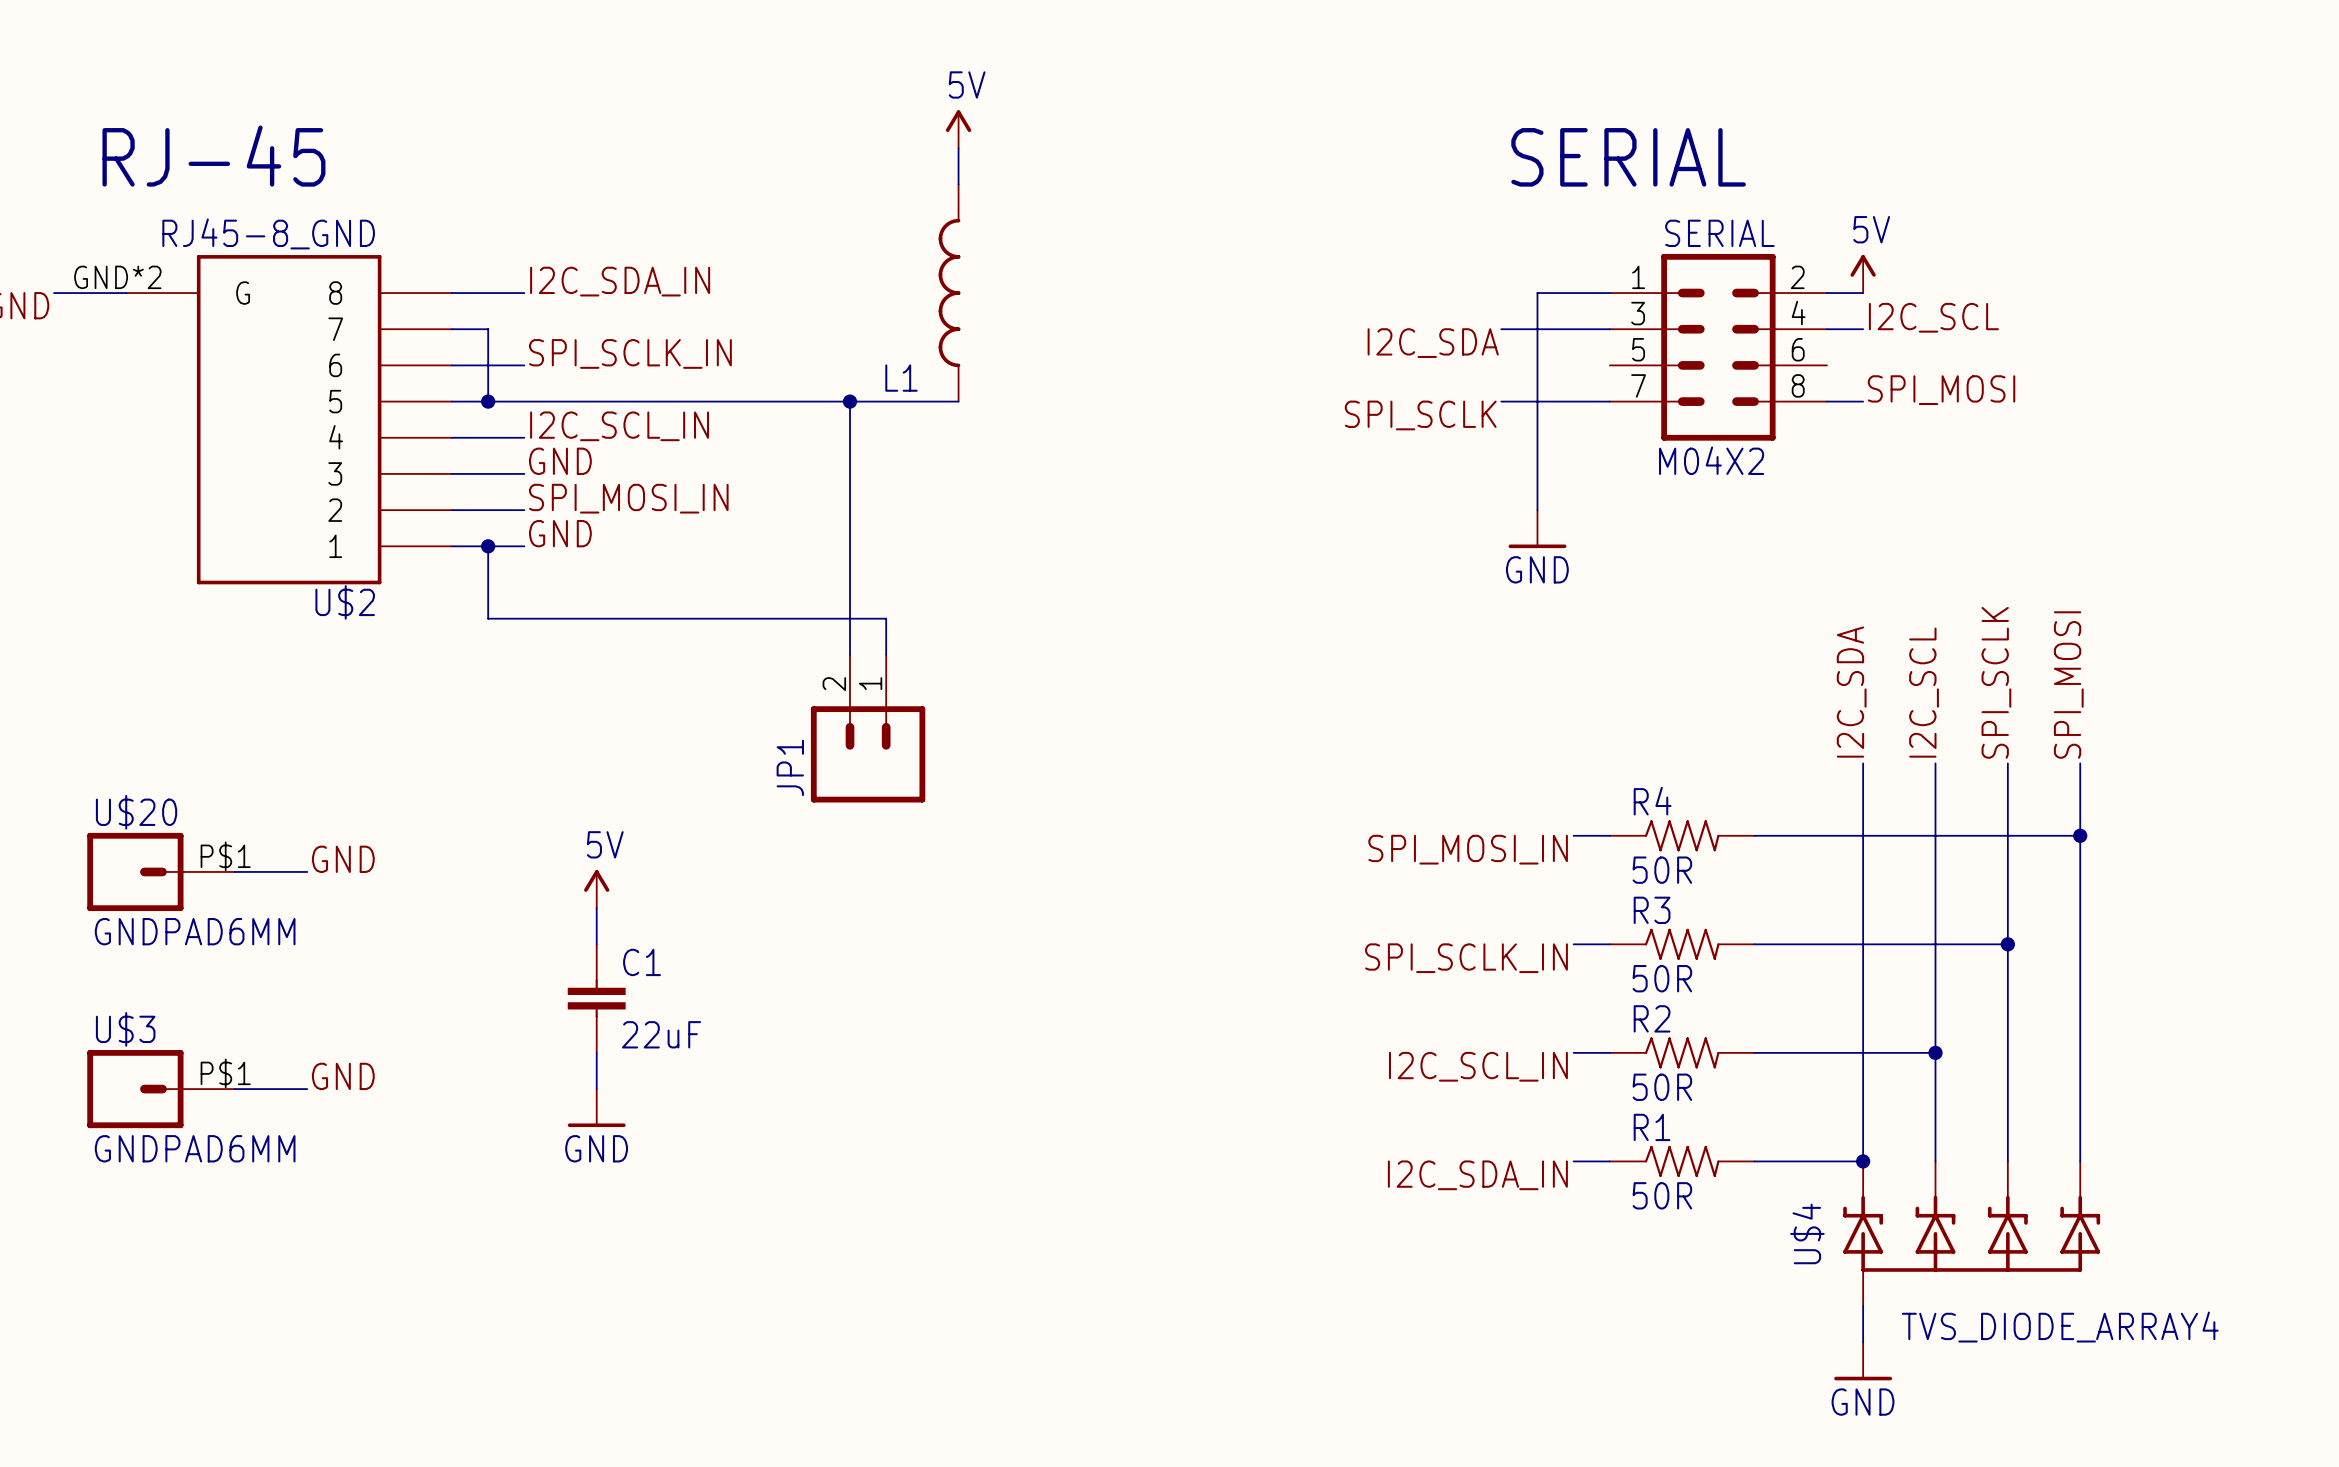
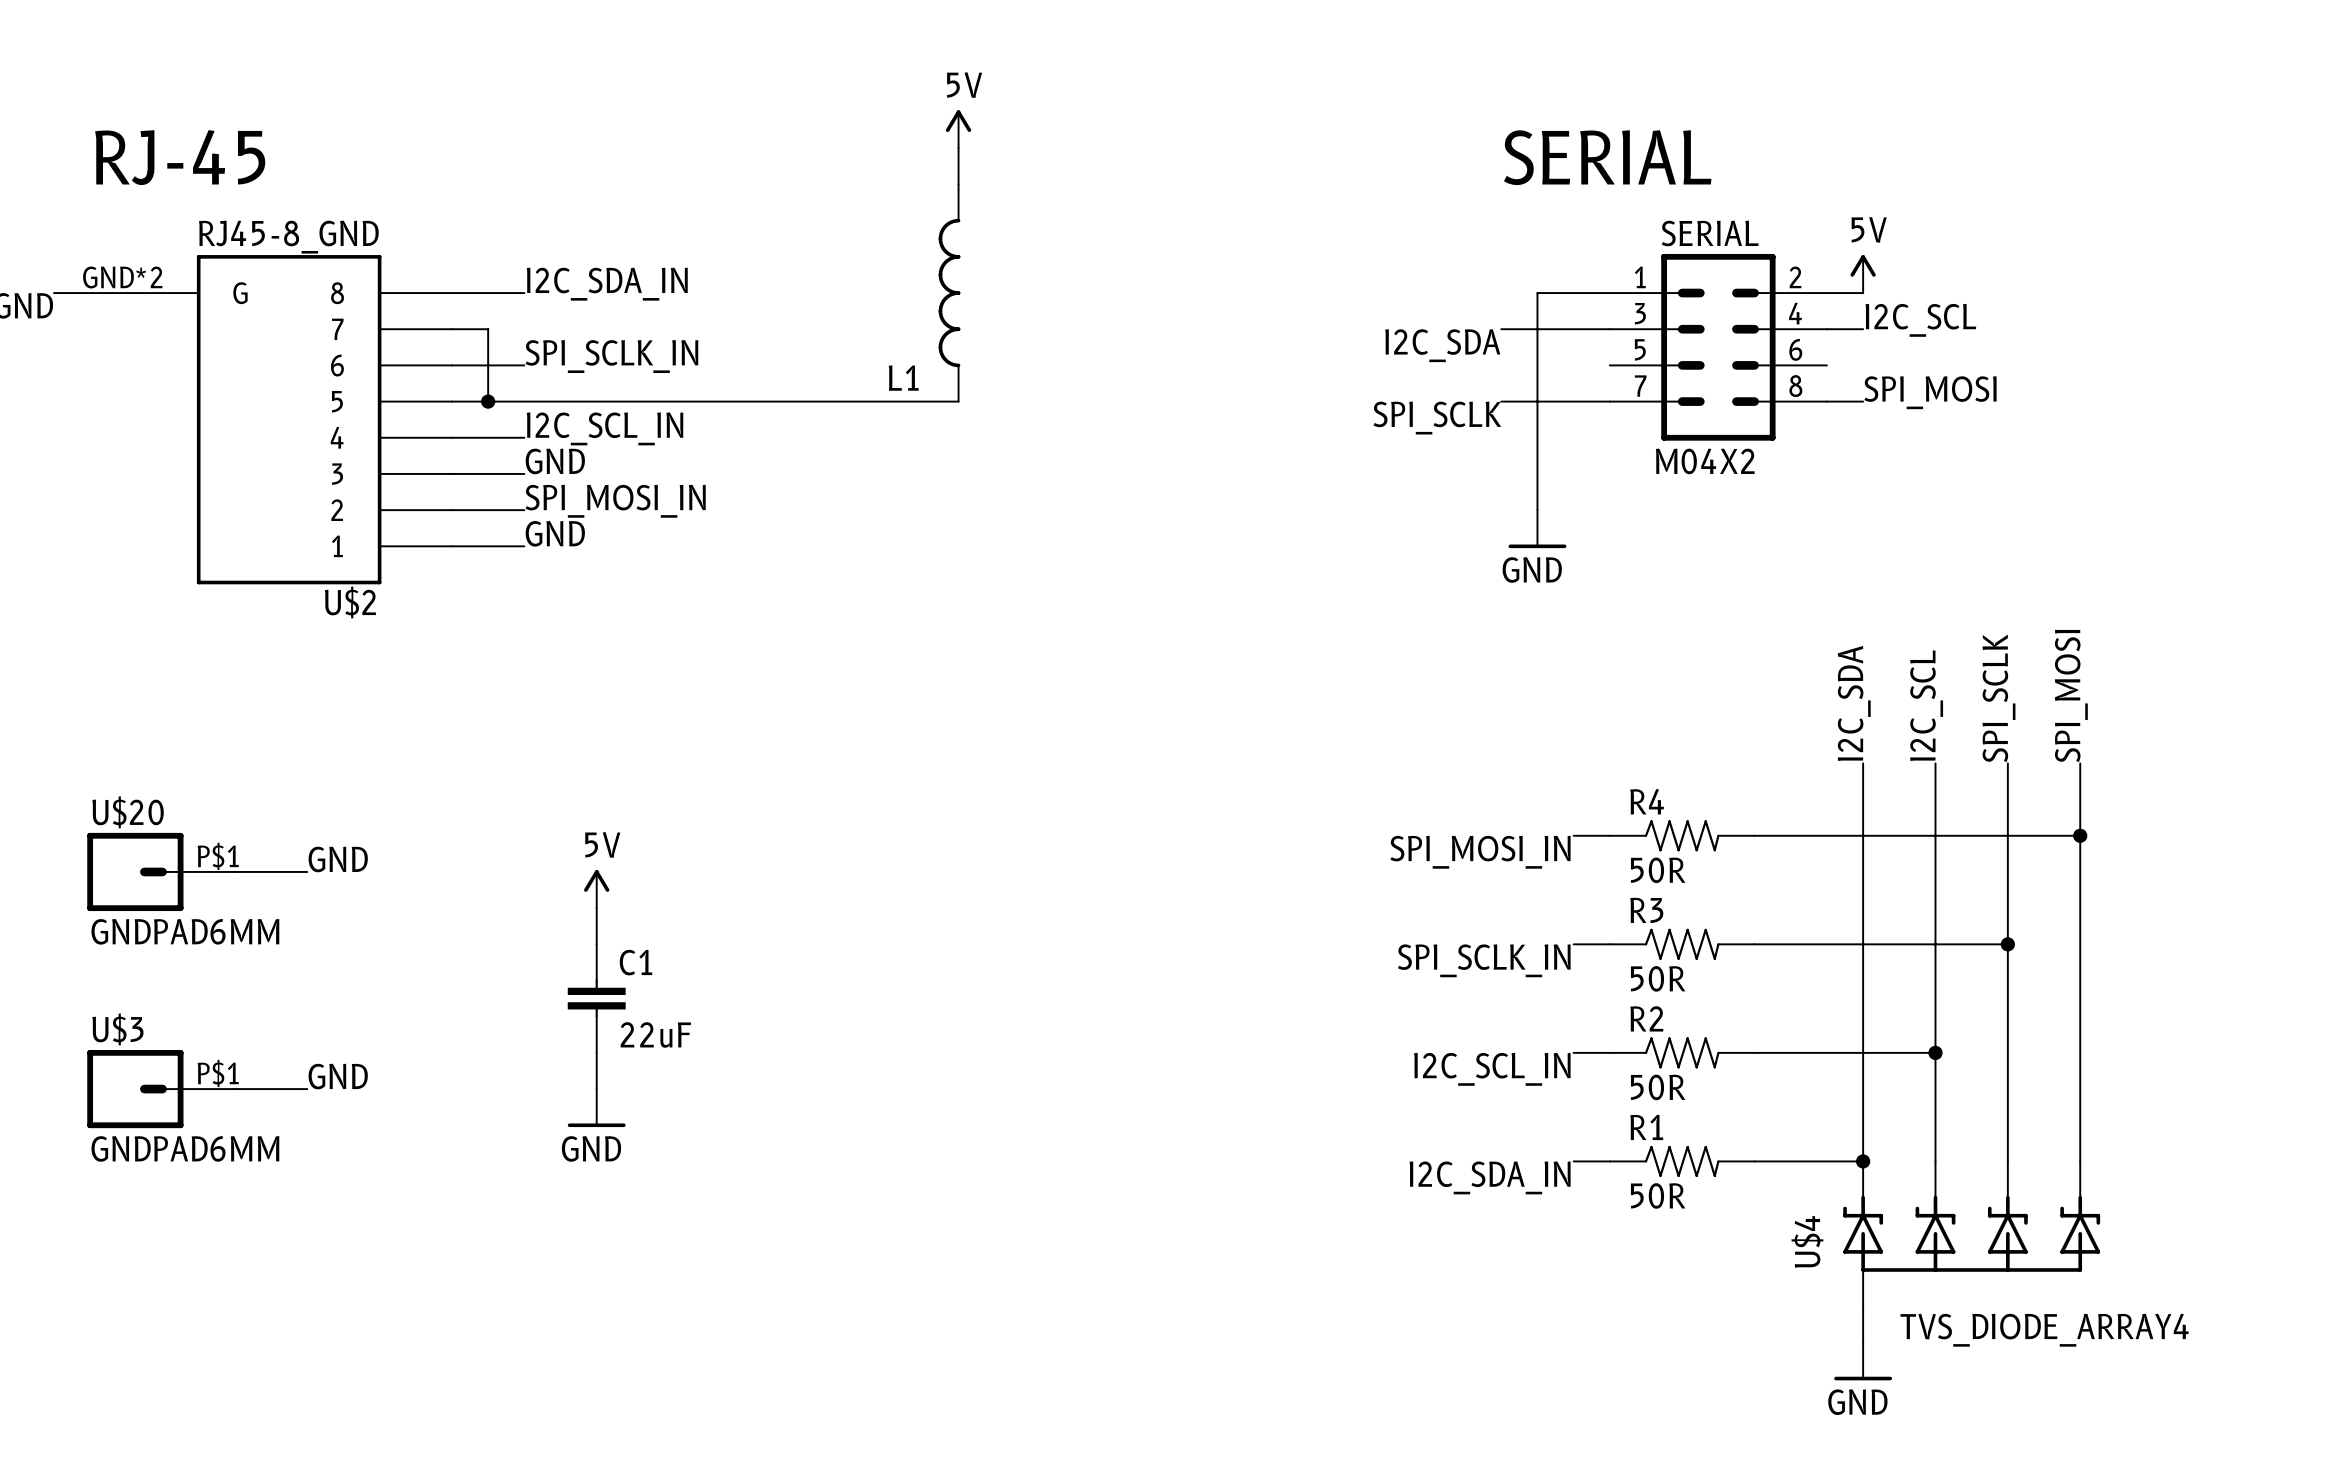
wire: (849, 401) (849, 654) -> none
junction: (849, 401) -> none
wire: (488, 546) (488, 618) (886, 618) (886, 654) -> none
junction: (488, 546) -> none
JP1: (868, 728) -> none

